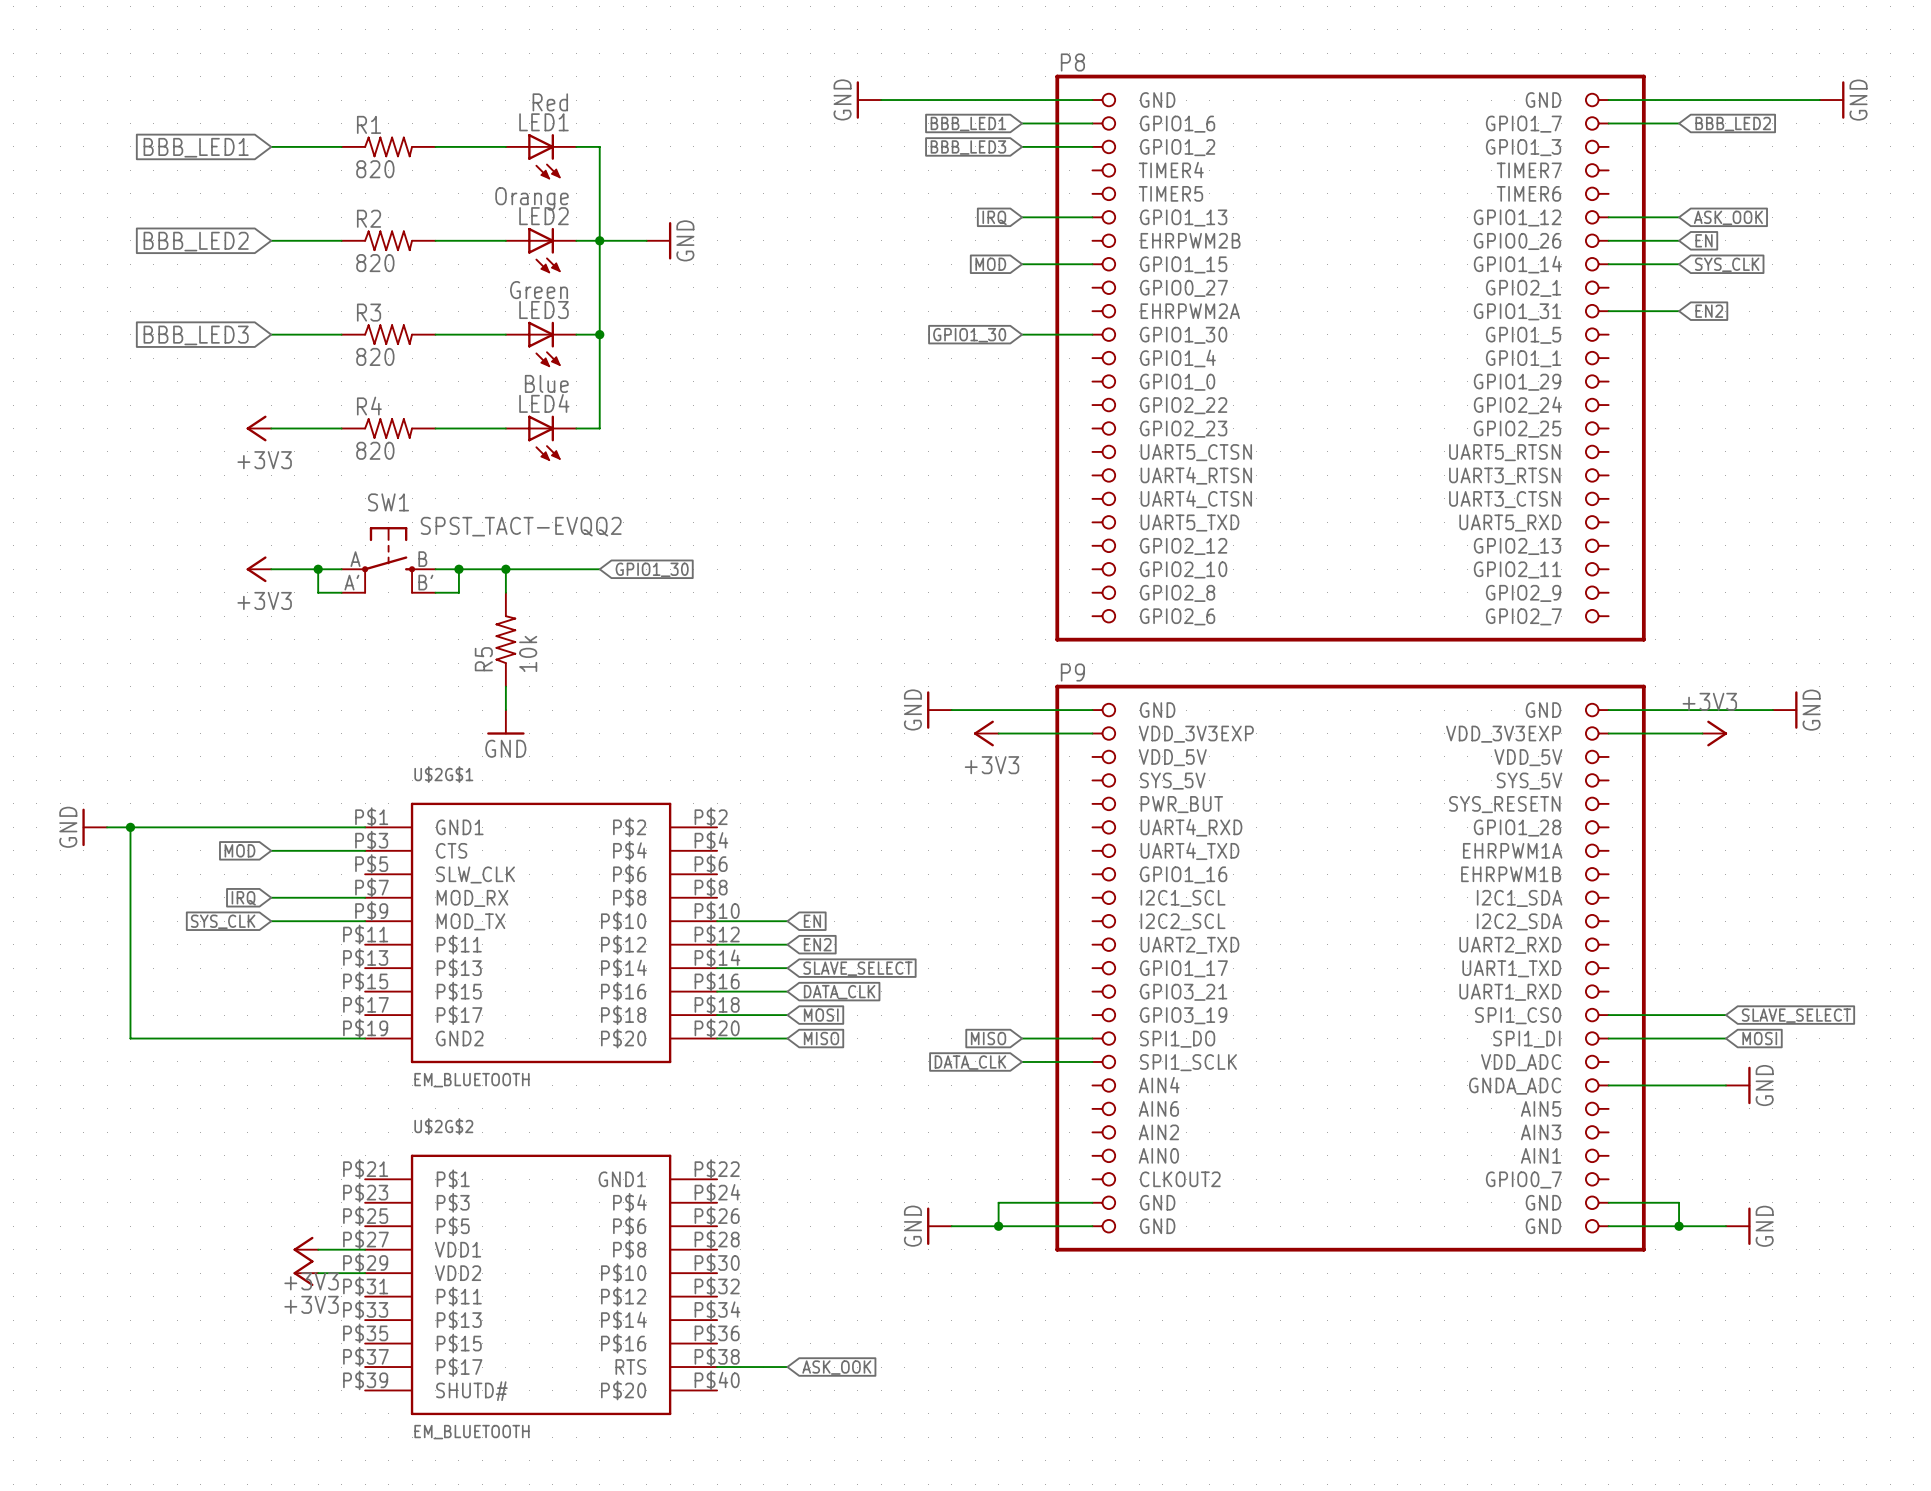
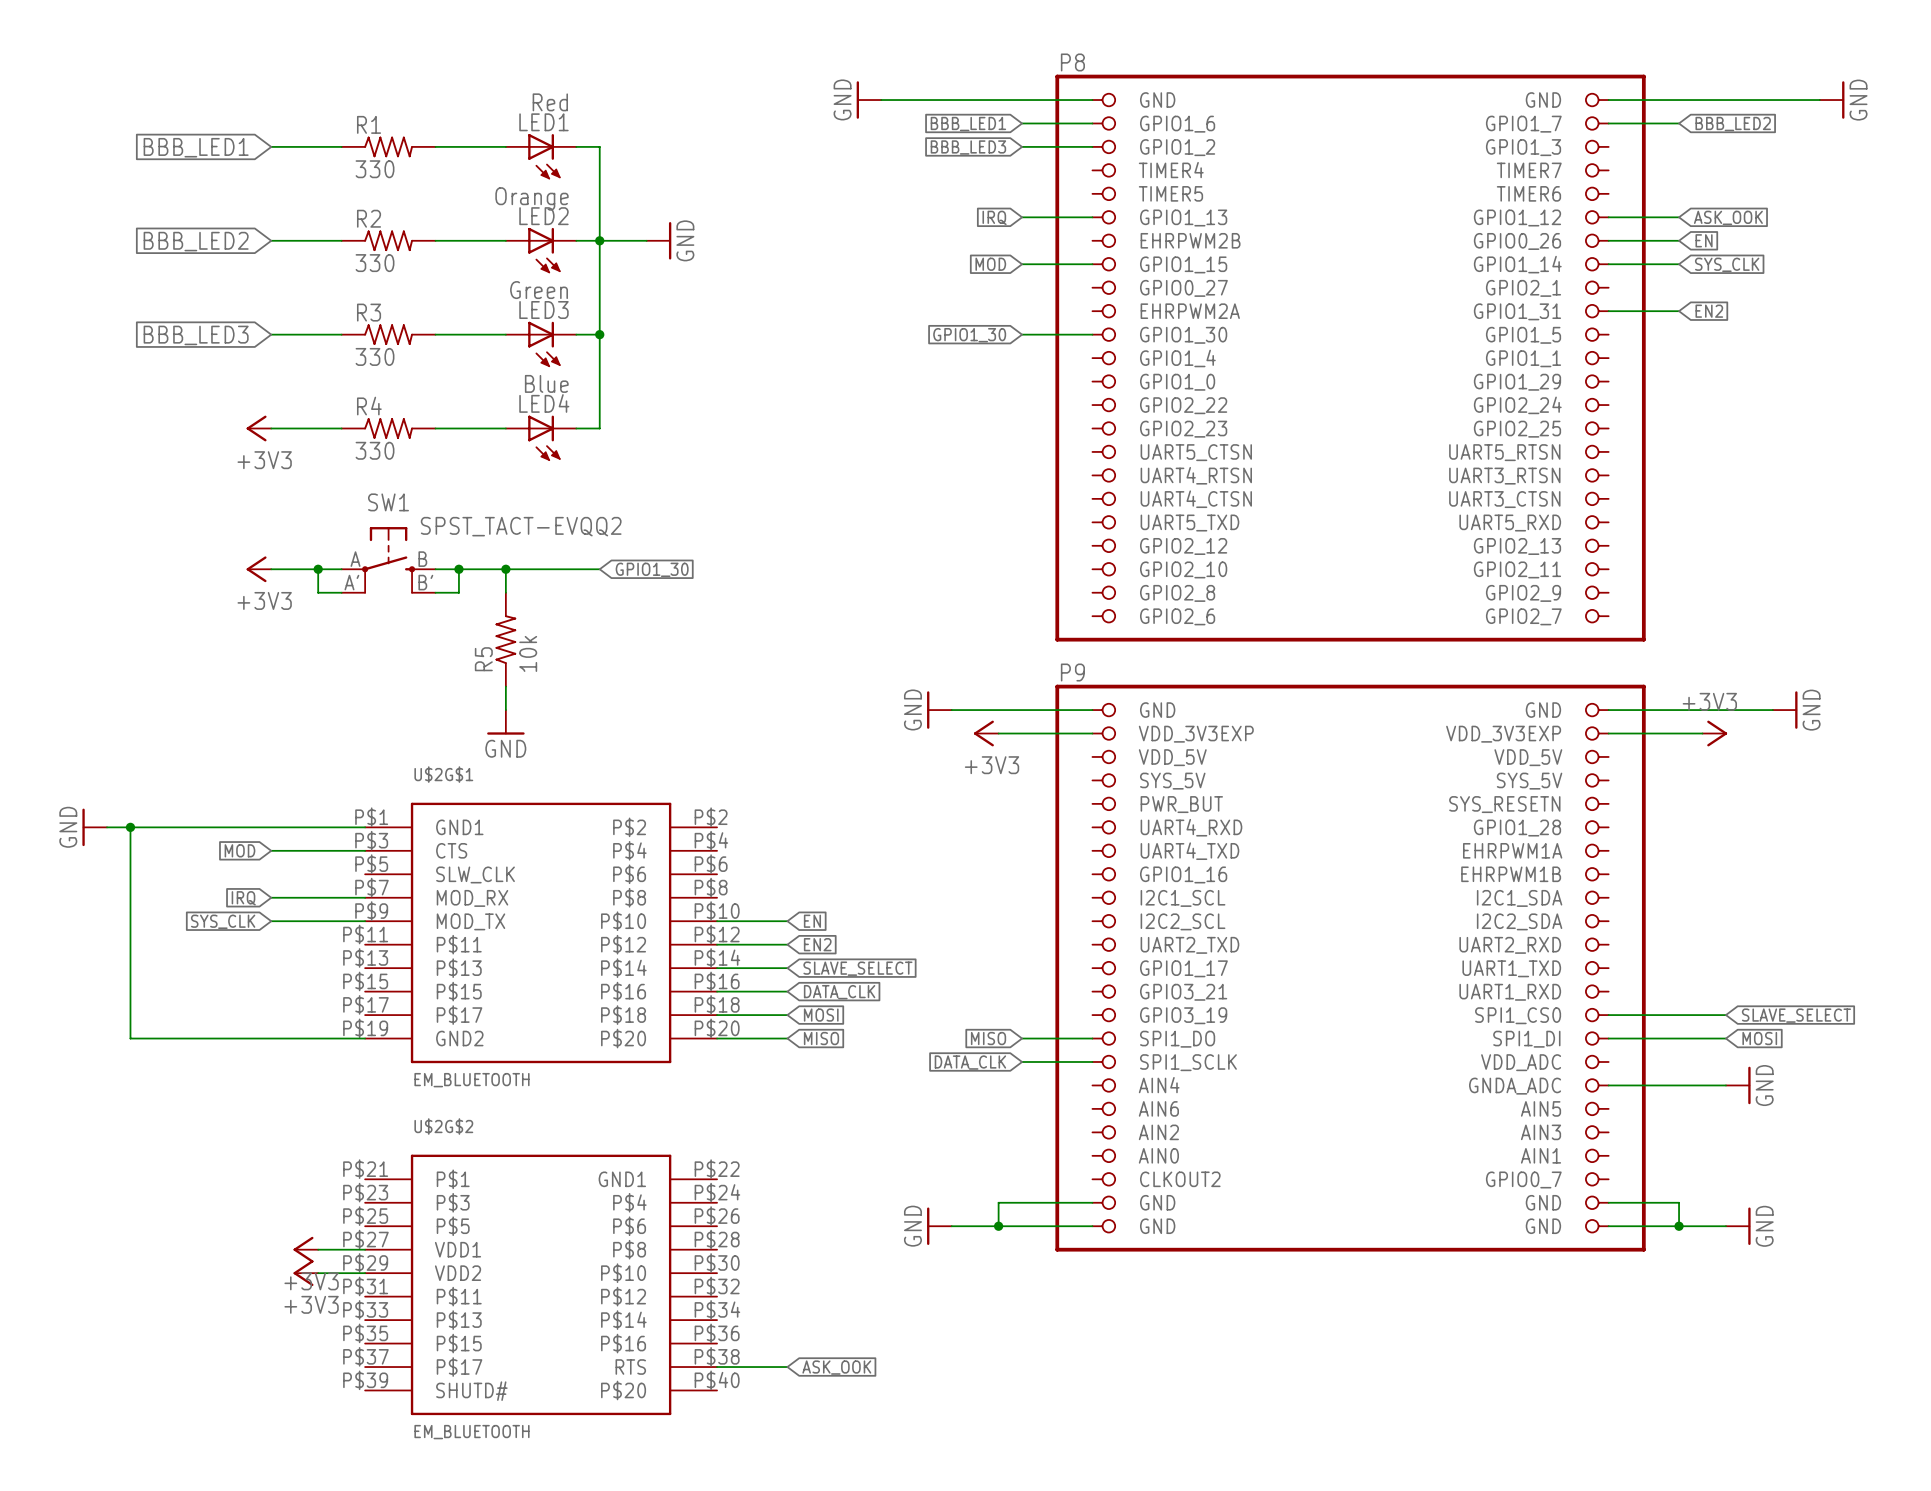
R1 value: 820 (375, 169) -> 330 (375, 169)
R2 value: 820 (375, 263) -> 330 (375, 263)
R3 value: 820 (375, 356) -> 330 (375, 356)
R4 value: 820 (375, 450) -> 330 (375, 450)

